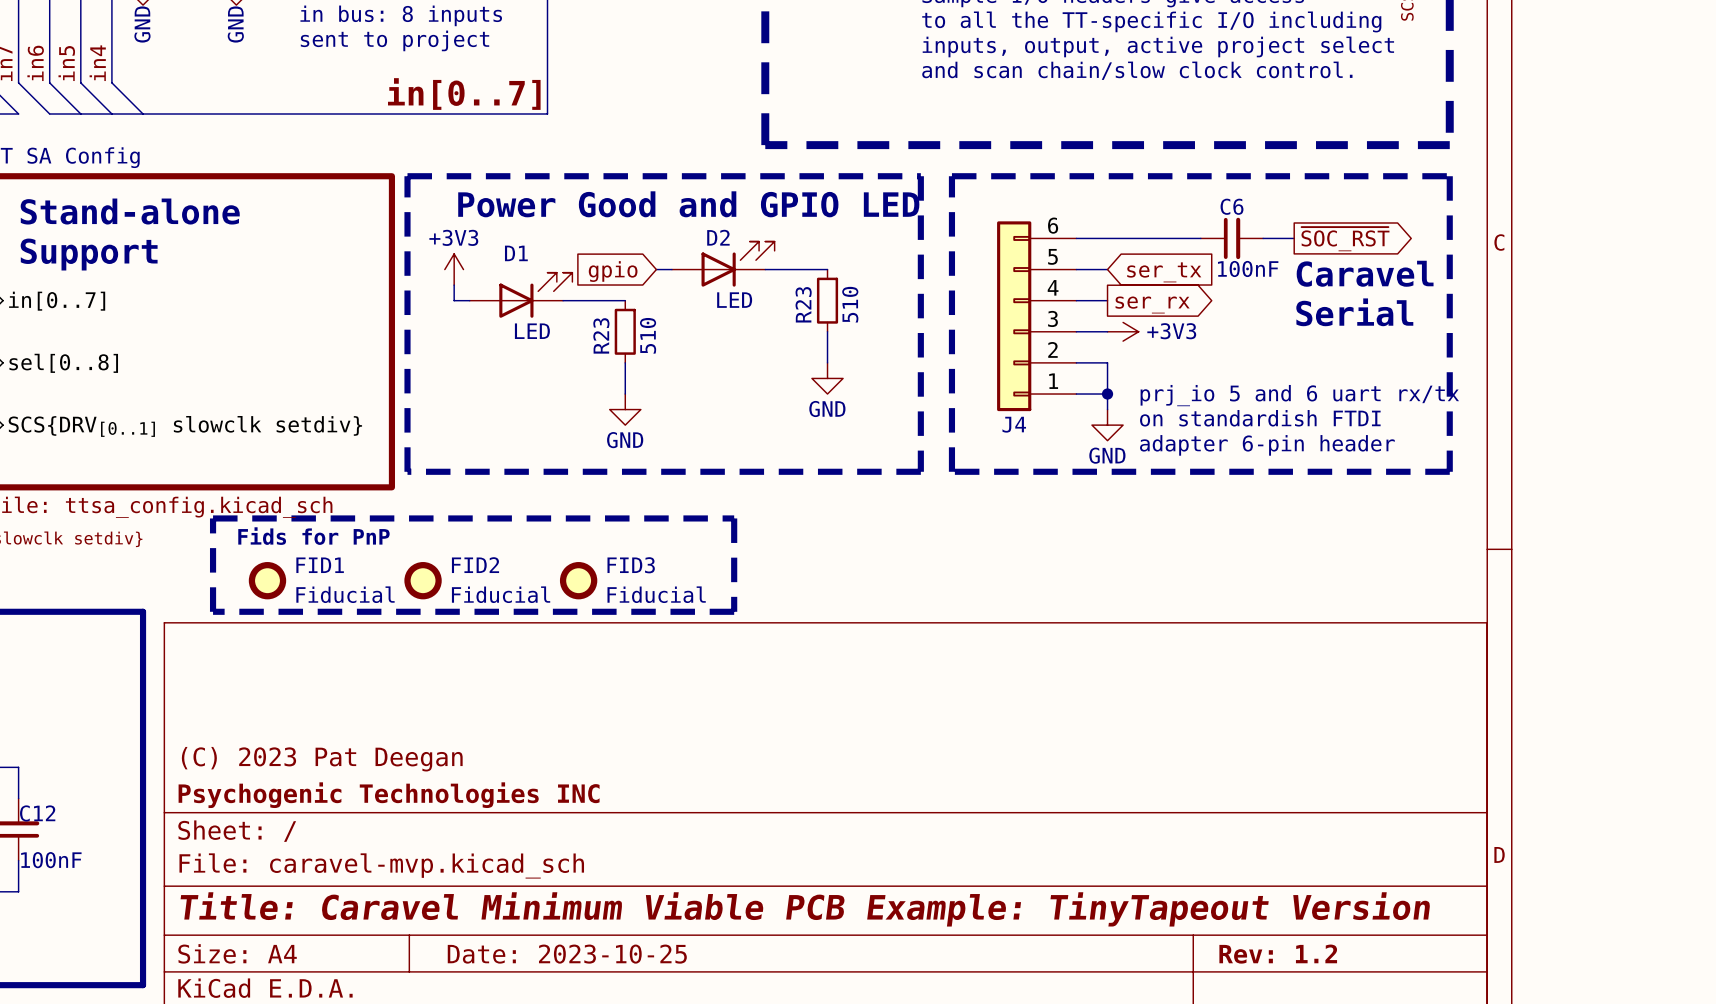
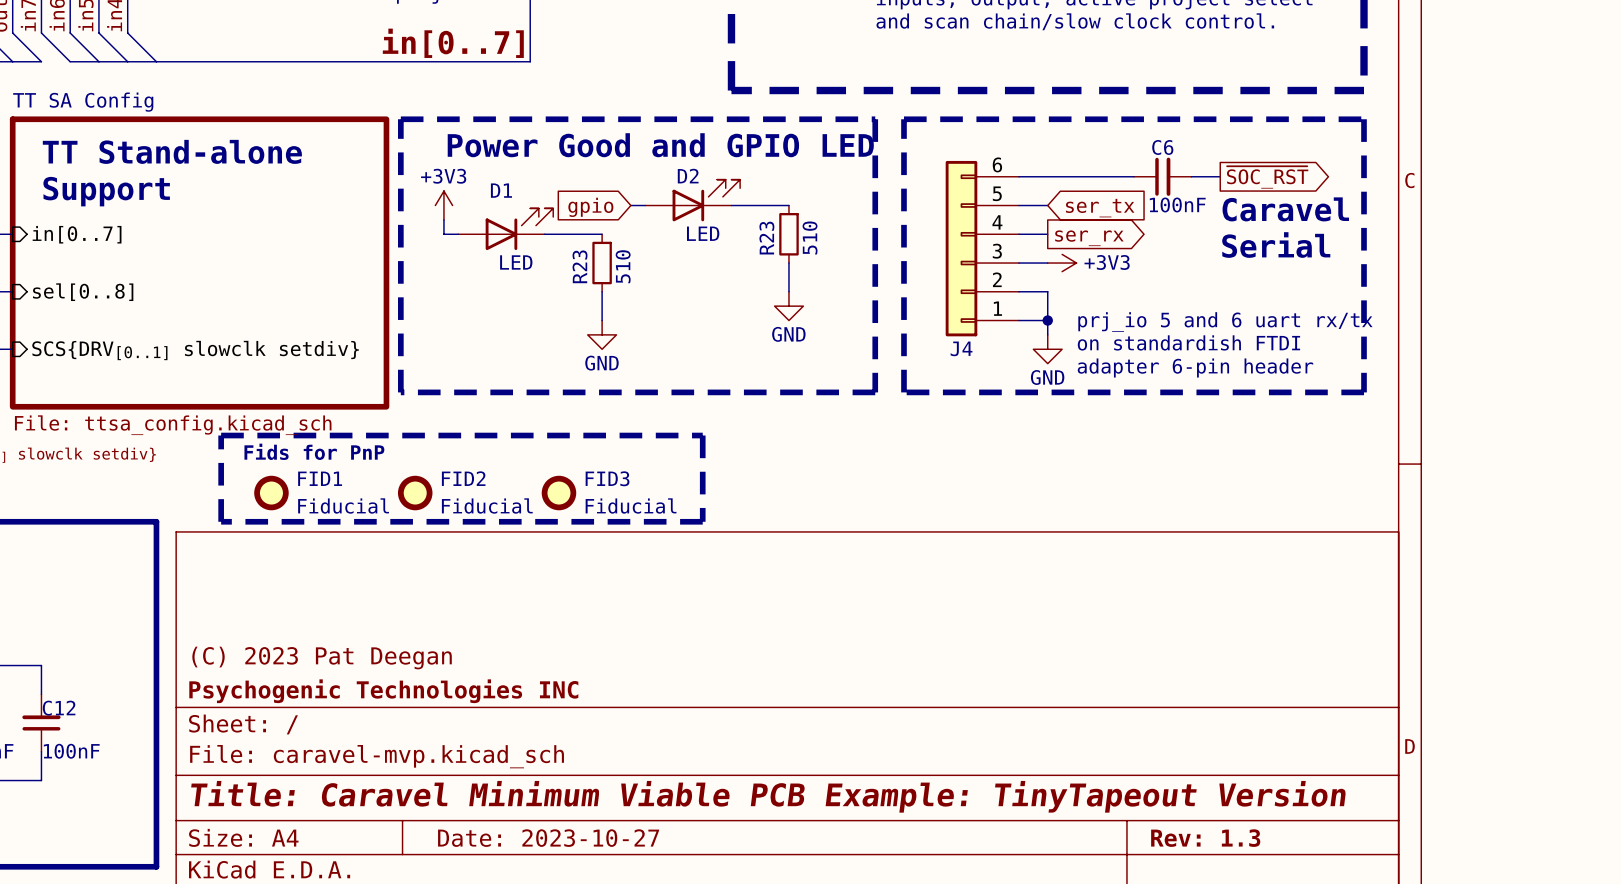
text: Stand-alone (130, 211) -> TT Stand-alone (172, 151)
title block: Date: 2023-10-25 (567, 954) -> Date: 2023-10-27 (548, 838)
title block: Rev: 1.2 (1278, 954) -> Rev: 1.3 (1205, 838)

